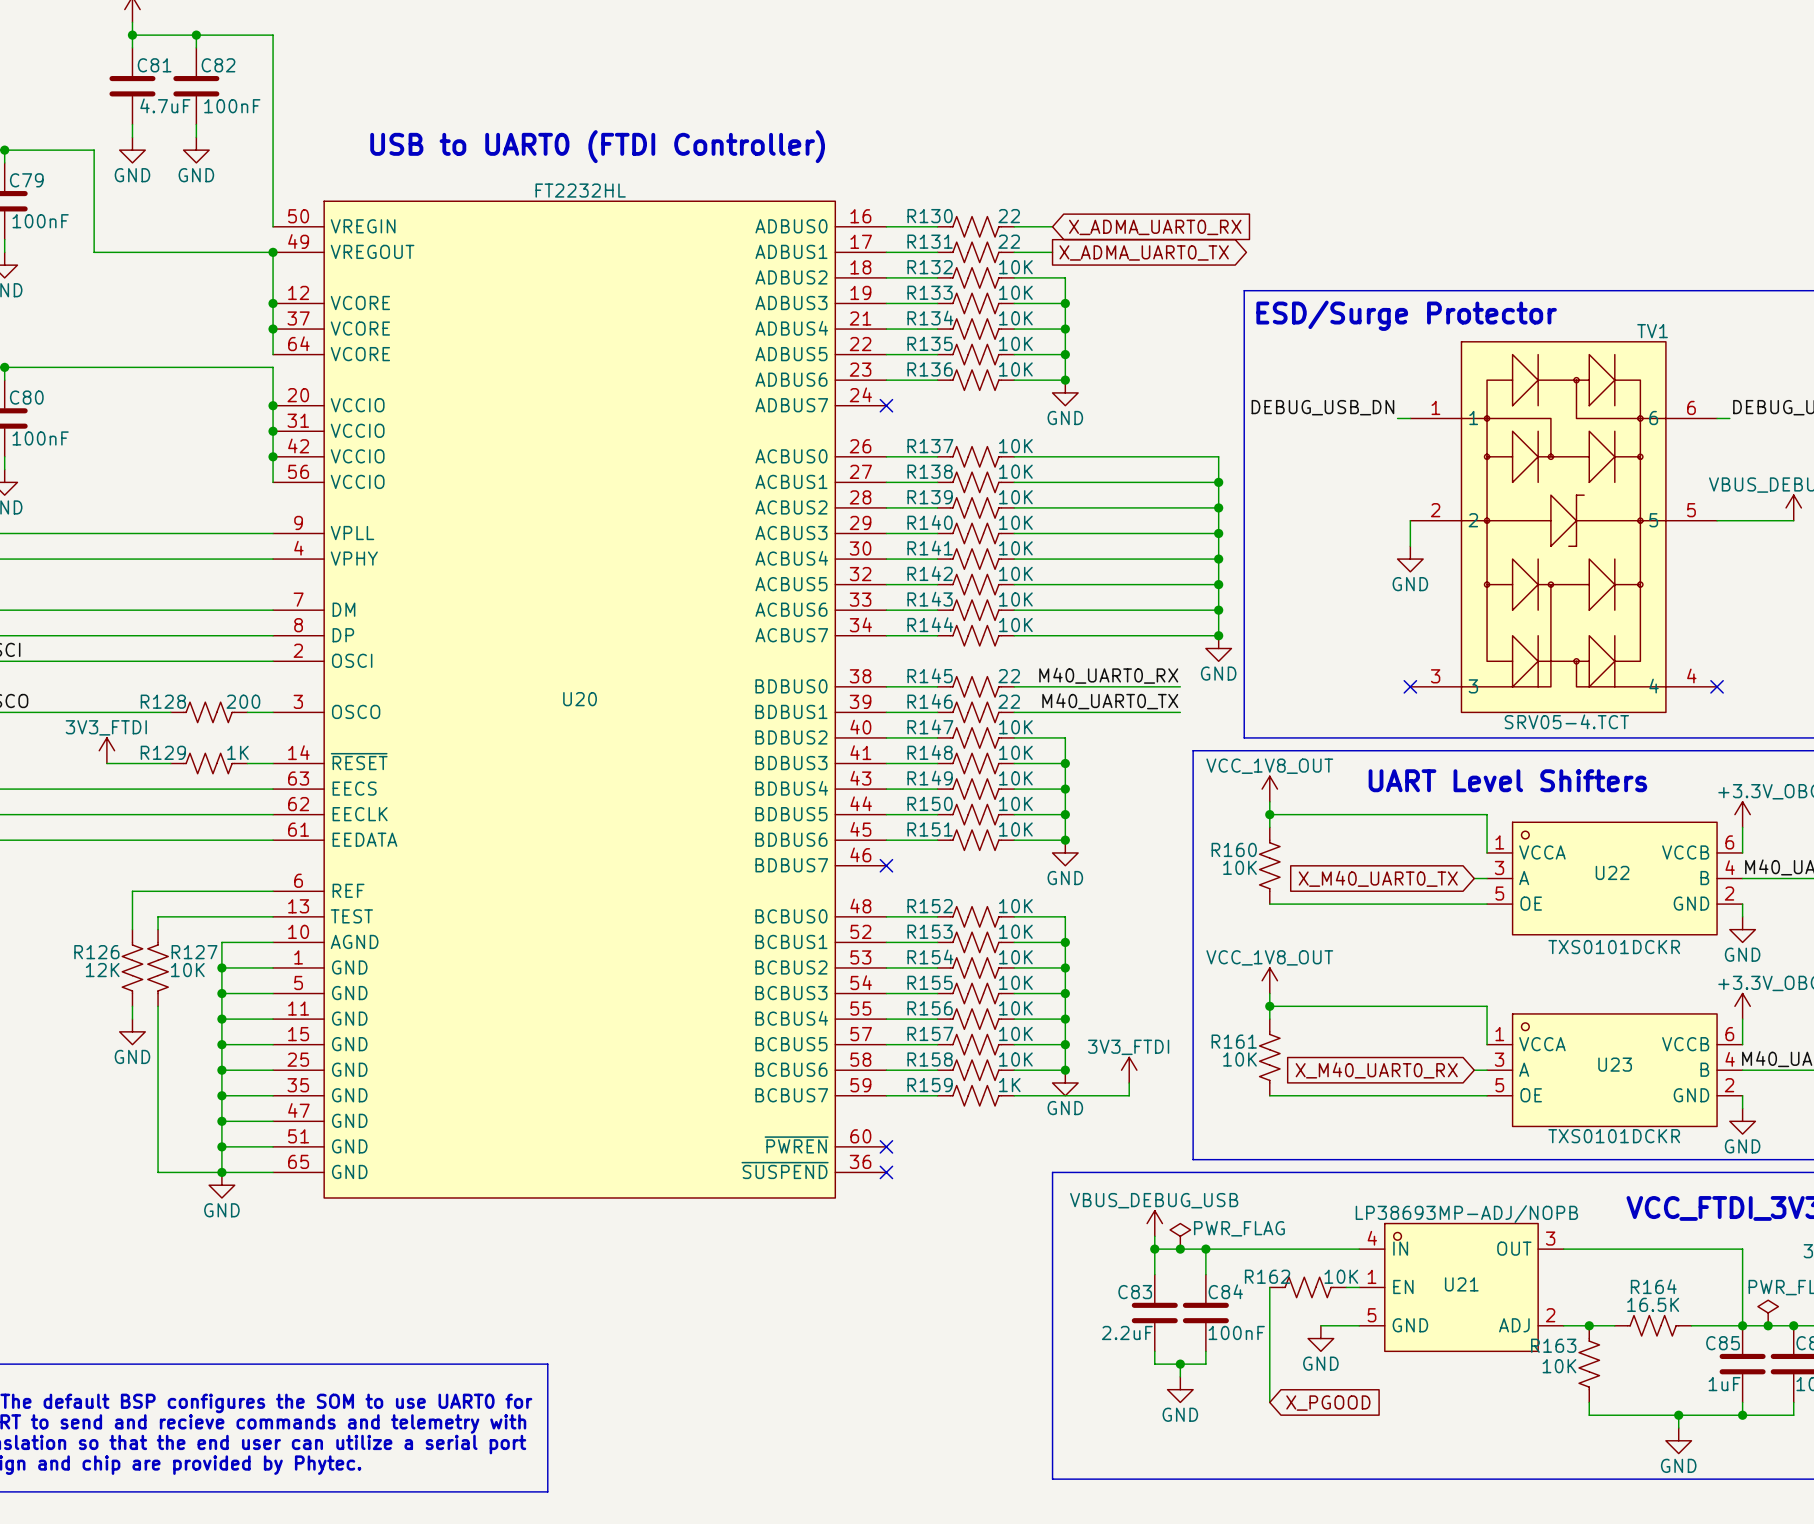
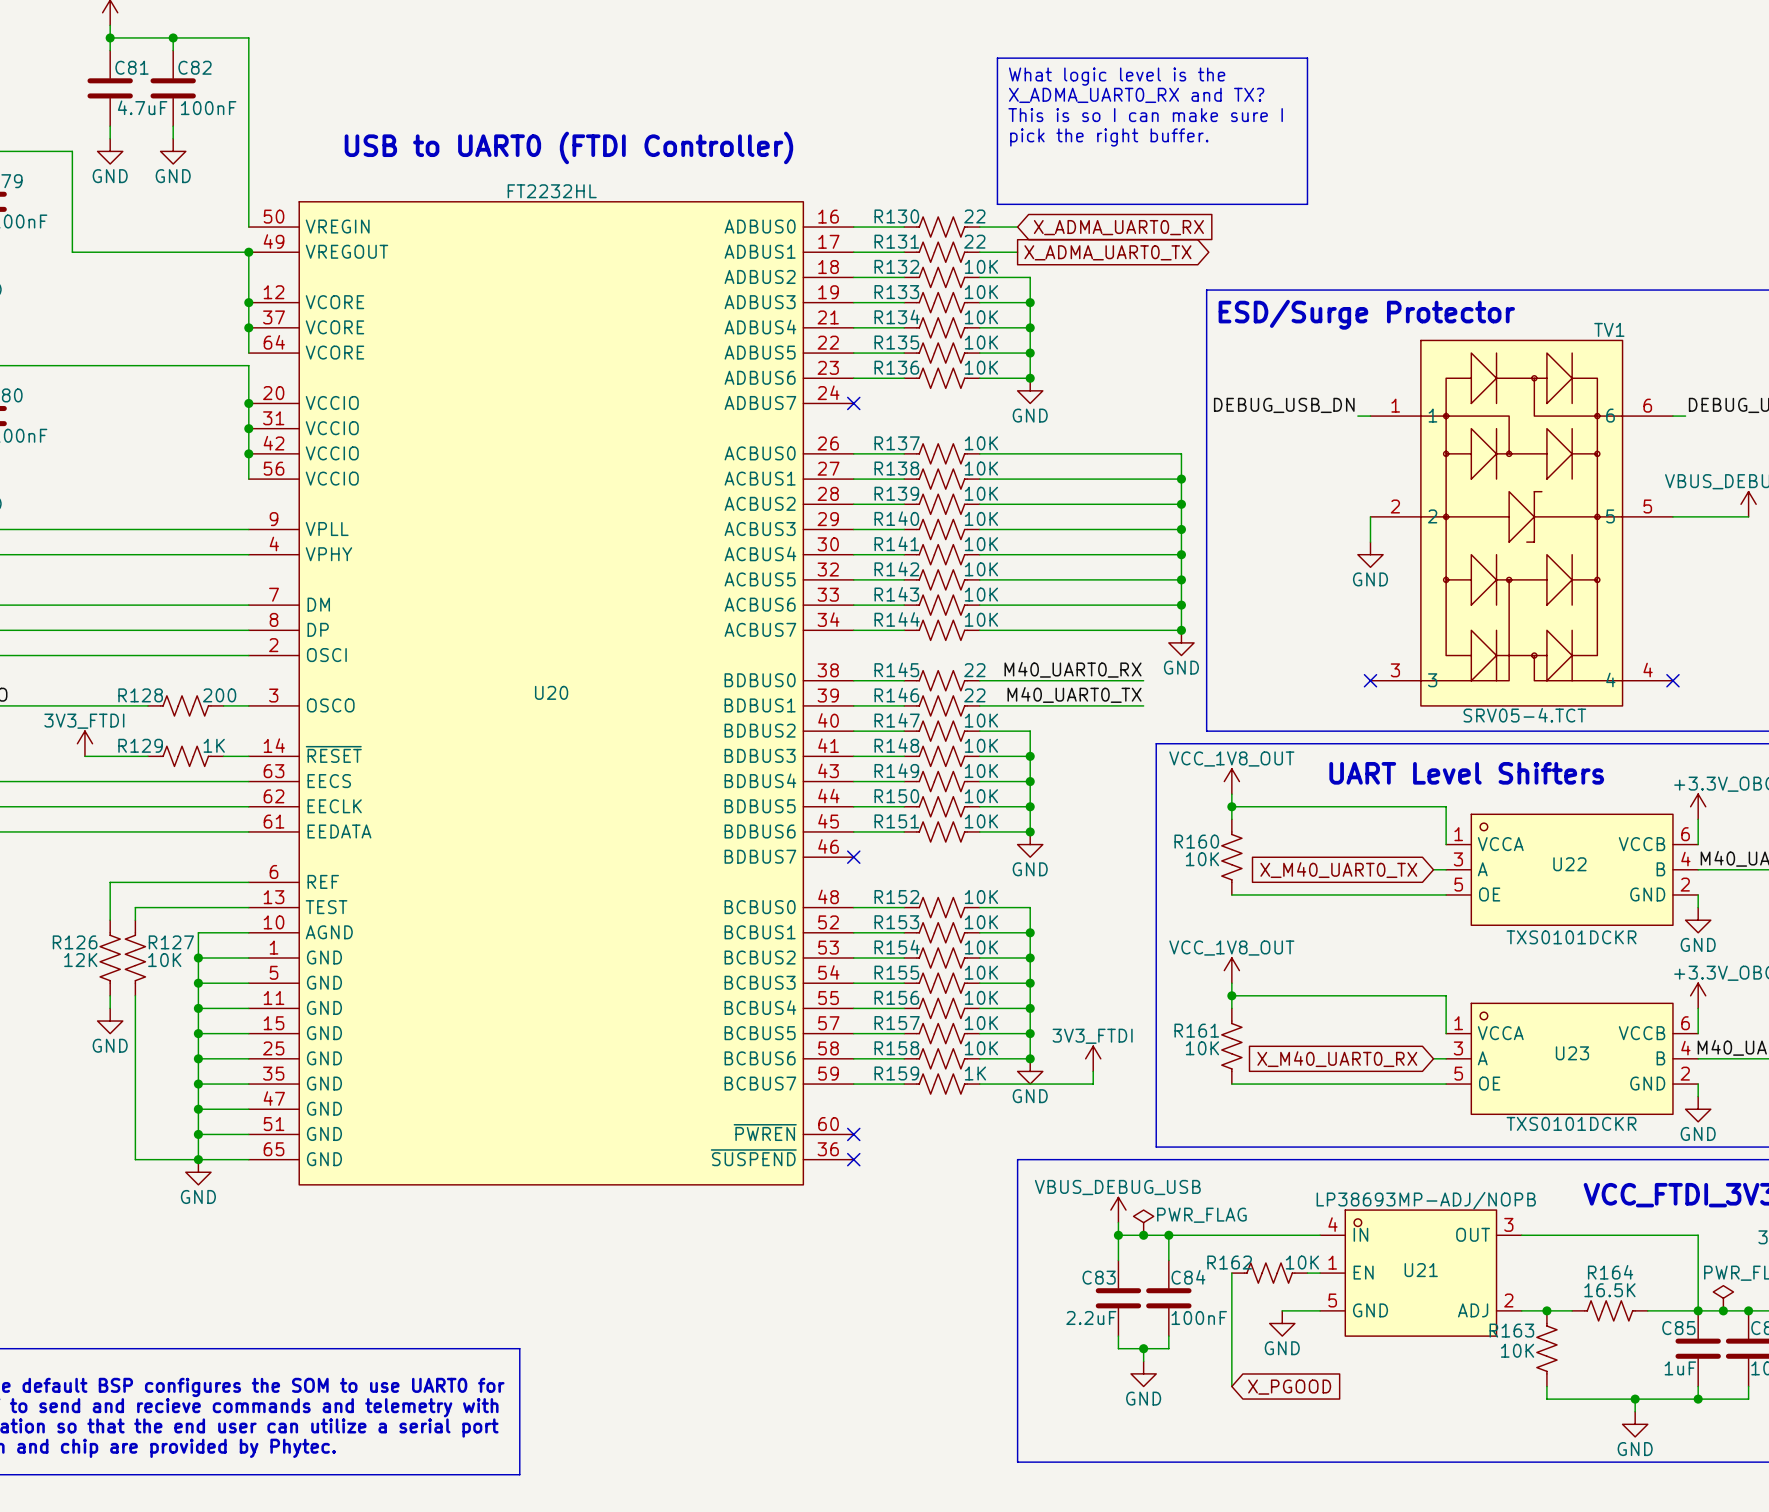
line: none -> (997, 58) (1307, 58) (1307, 204) (997, 204) (997, 58)
text: none -> What logic level is the (1117, 76)
text: none -> X_ADMA_UART0_RX and TX? (1136, 95)
text: none -> This is so I can make sure I (1145, 115)
text: none -> pick the right buffer. (1109, 137)

